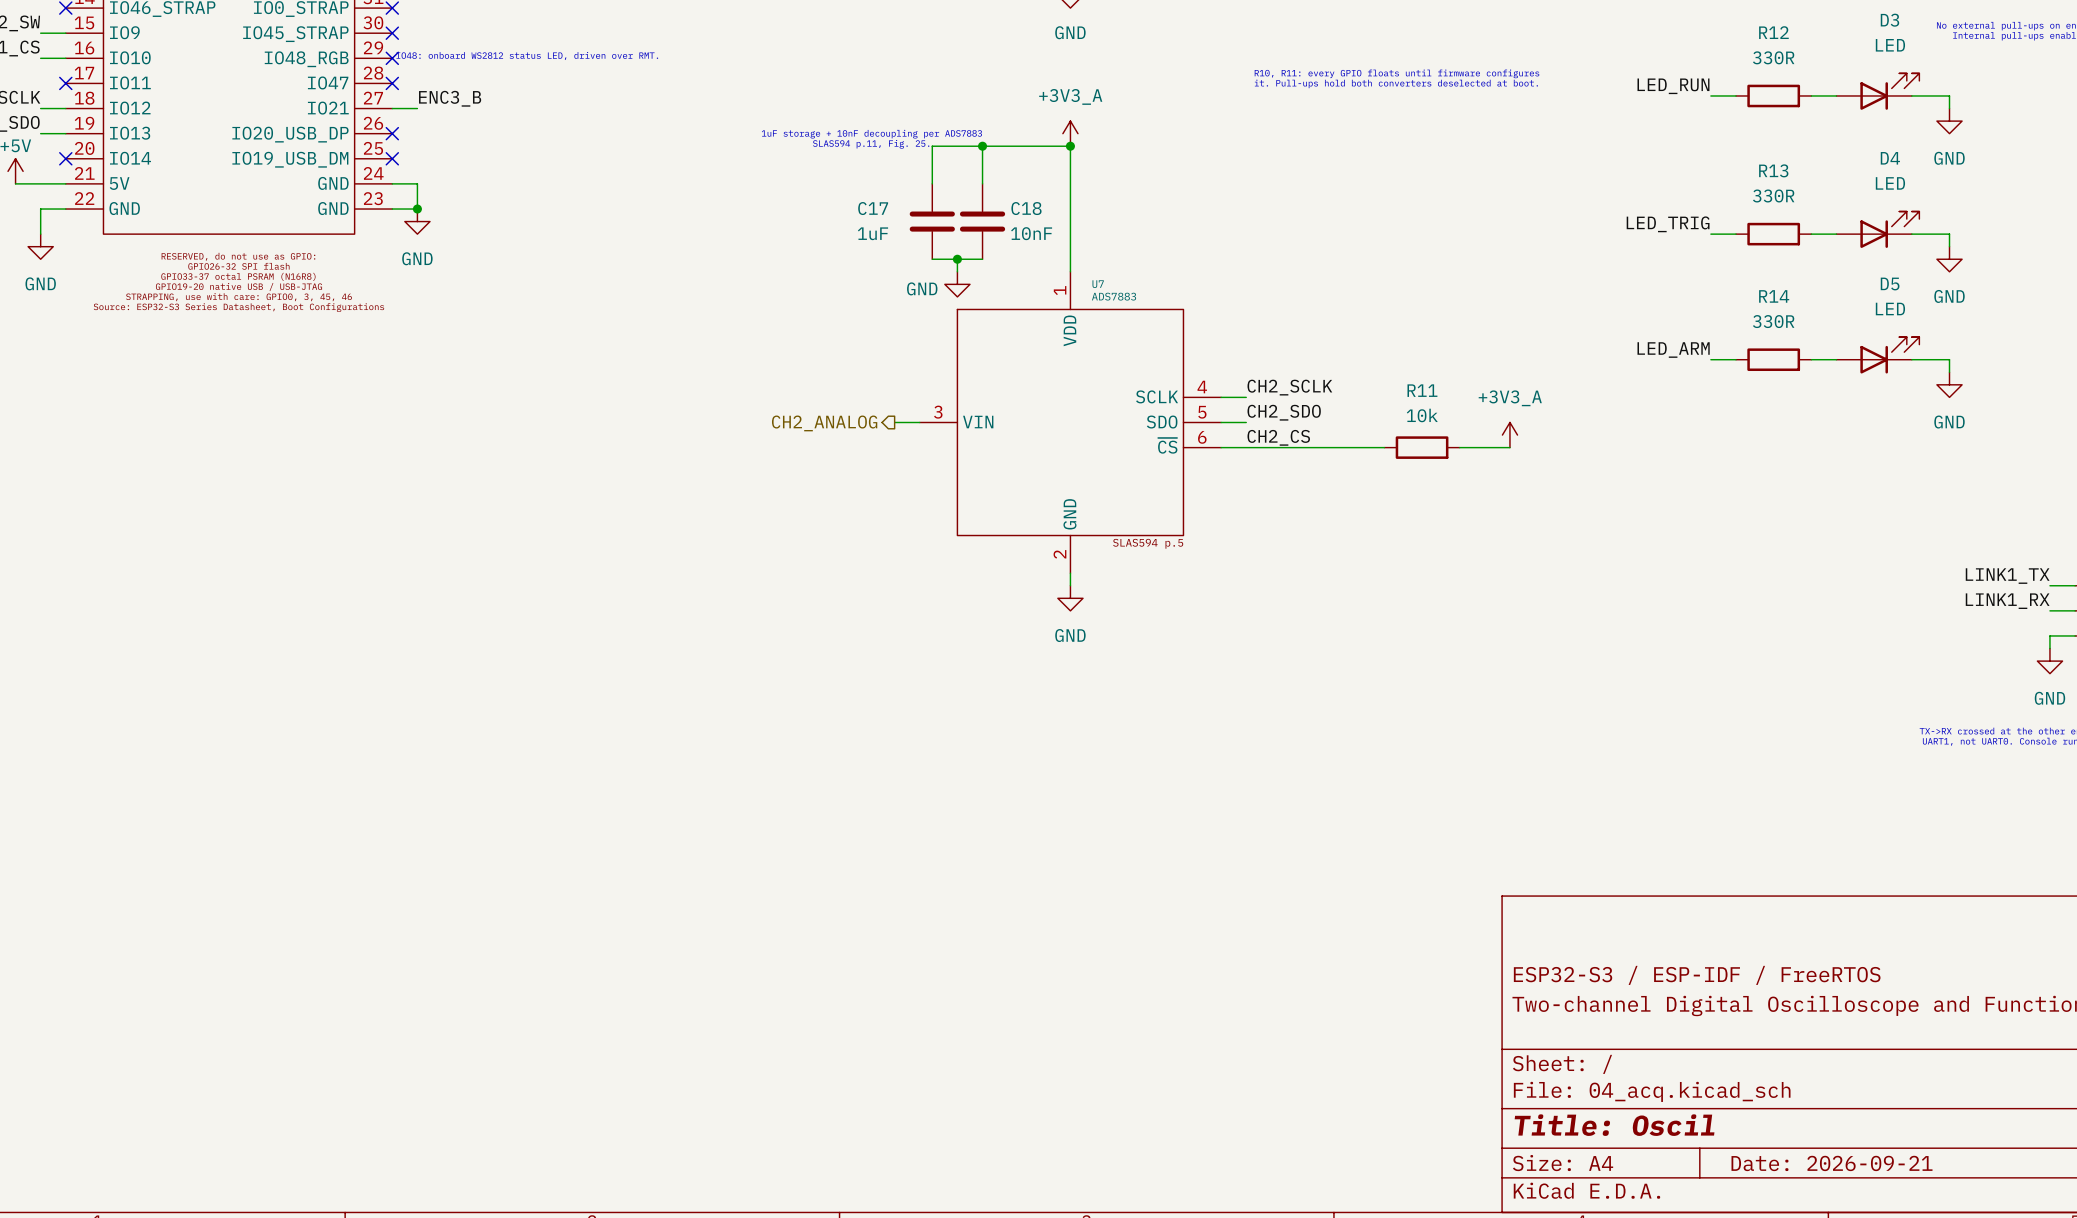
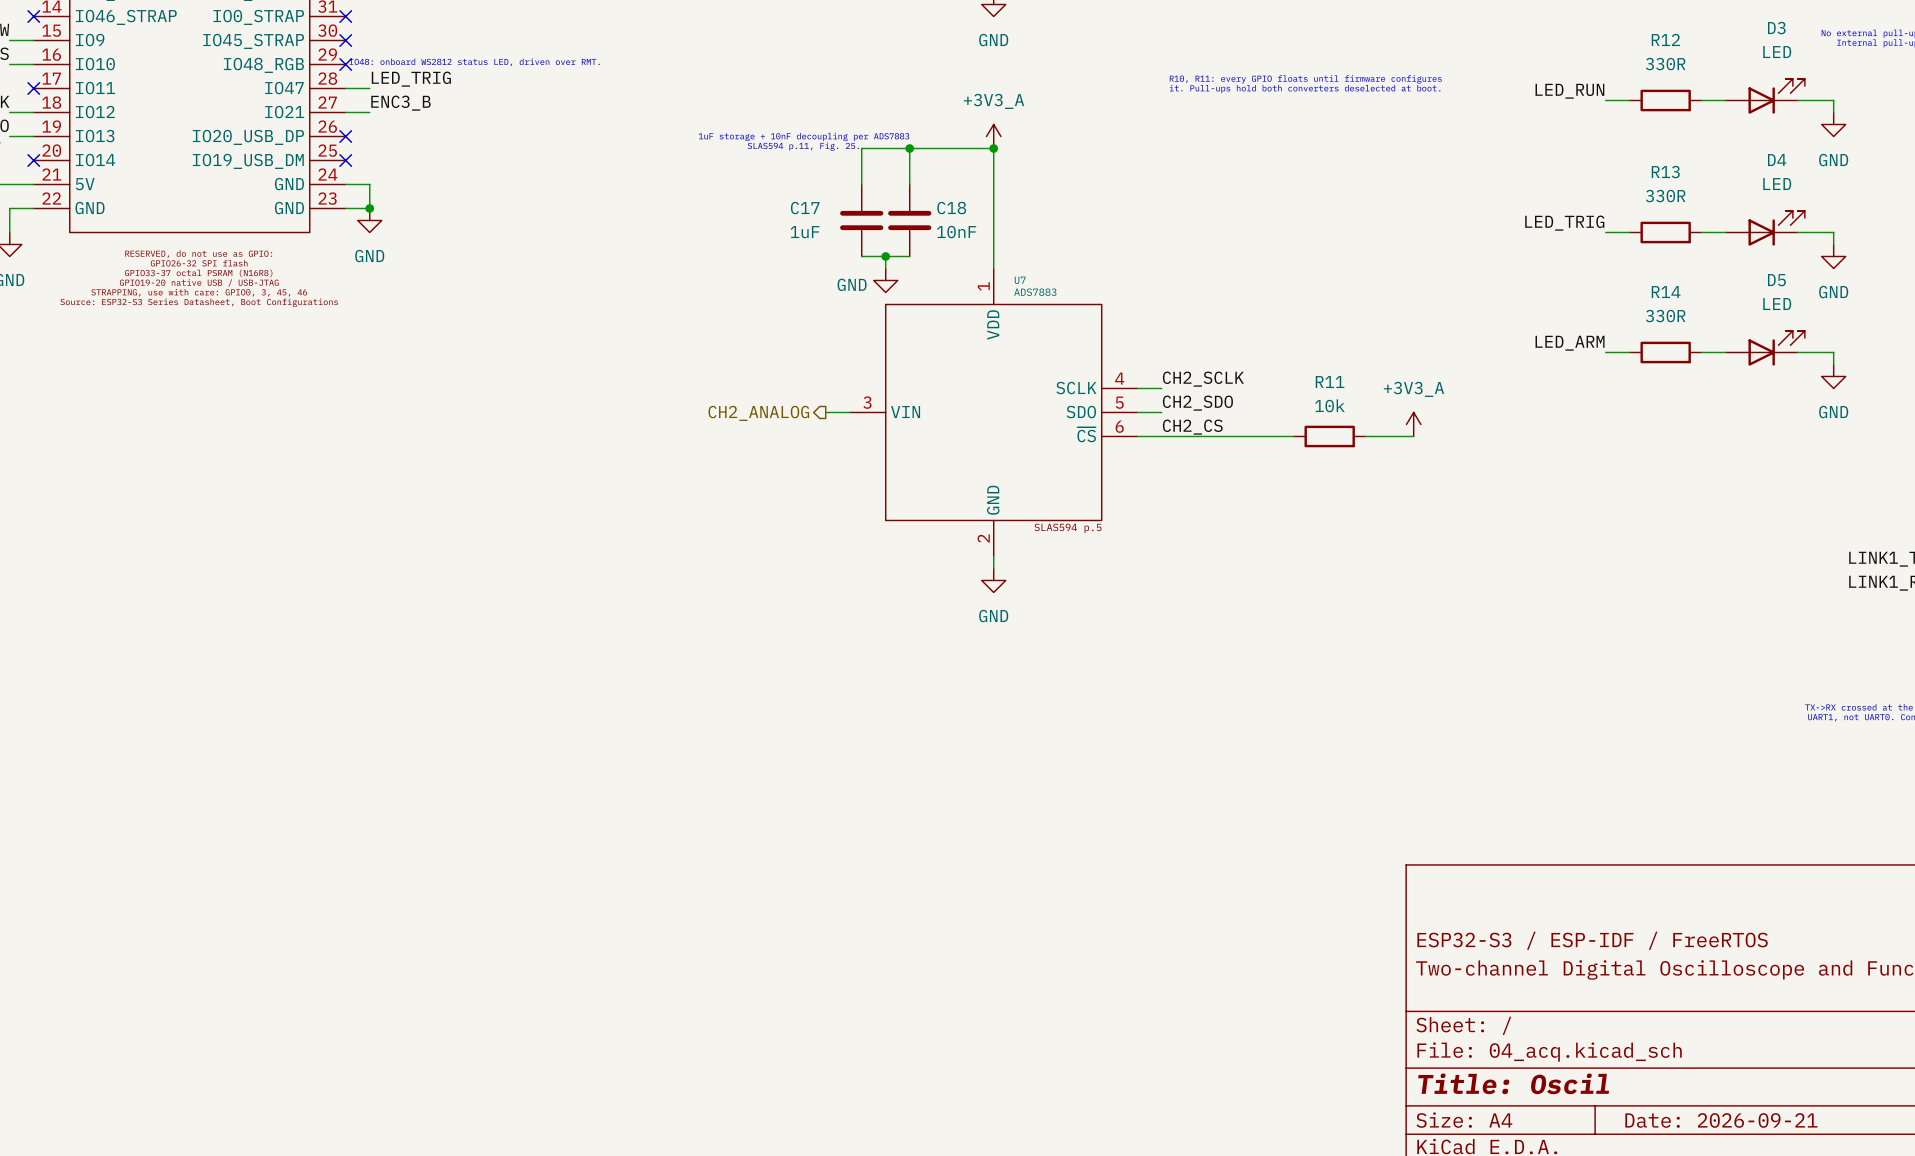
label: none -> LED_TRIG (411, 79)
wire: none -> (345, 88) (369, 88)
no-connect mark: (392, 83) -> none

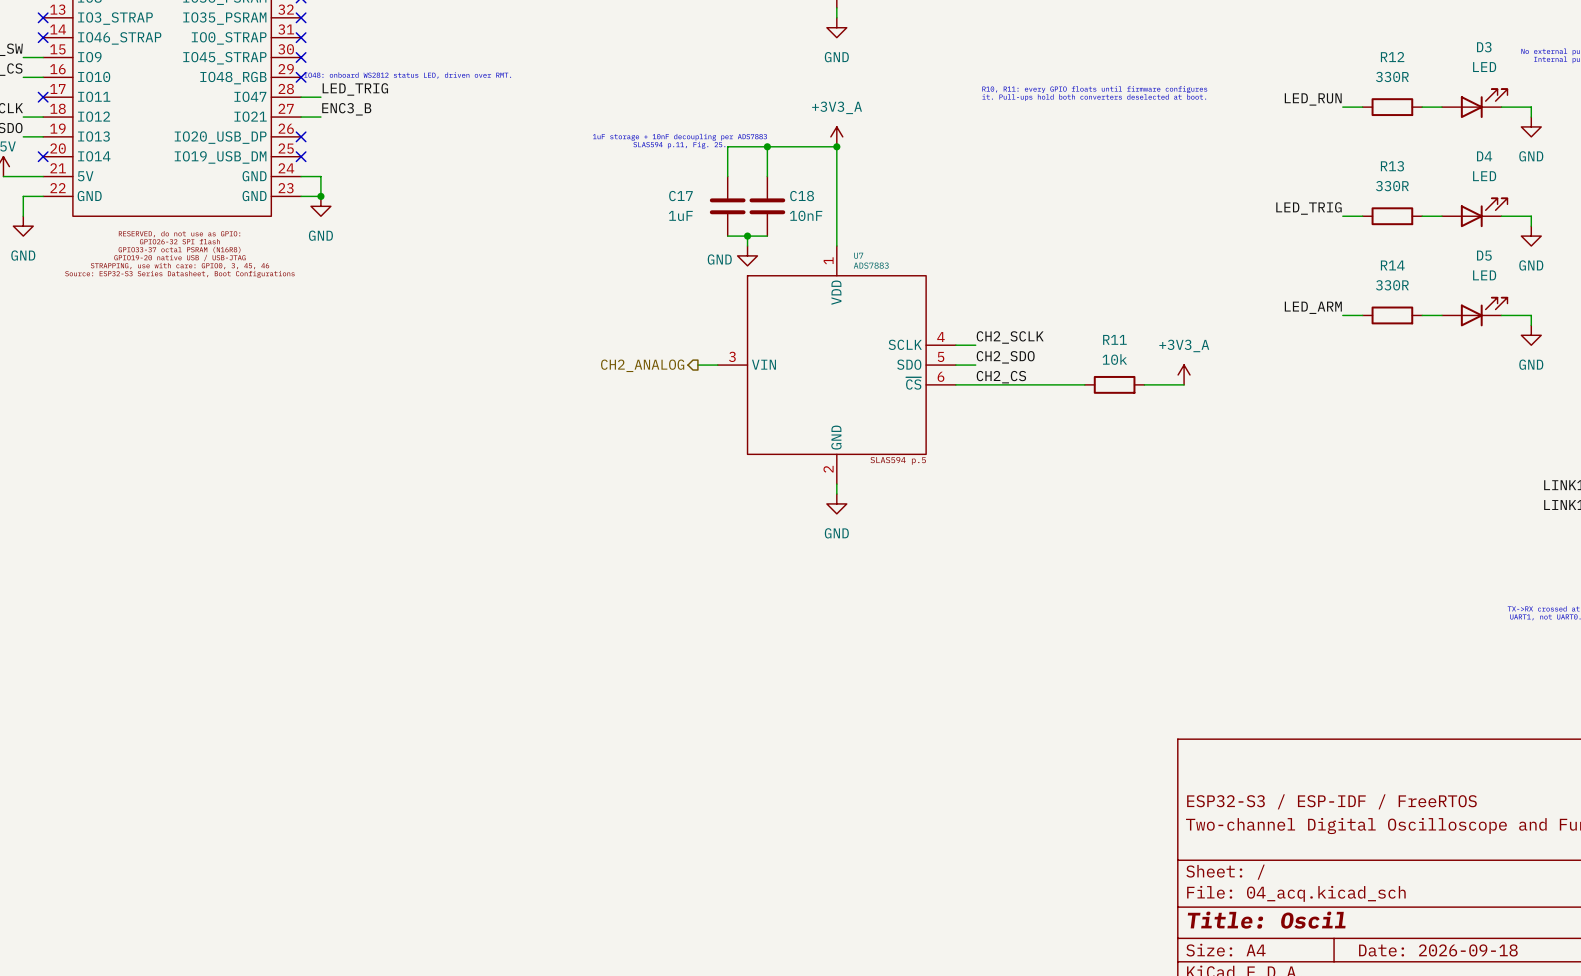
title block: Date: 2026-09-21 (1721, 1120) -> Date: 2026-09-18 (1438, 950)

